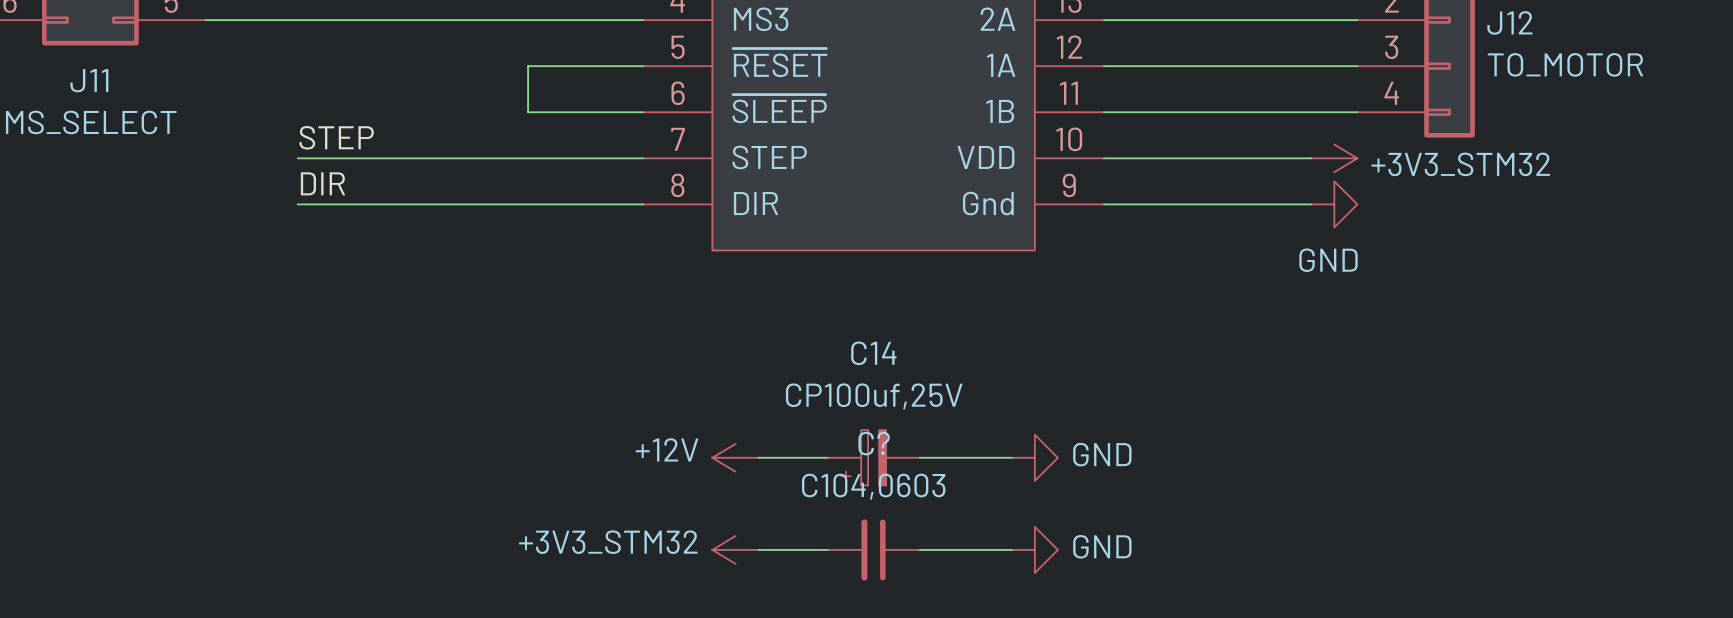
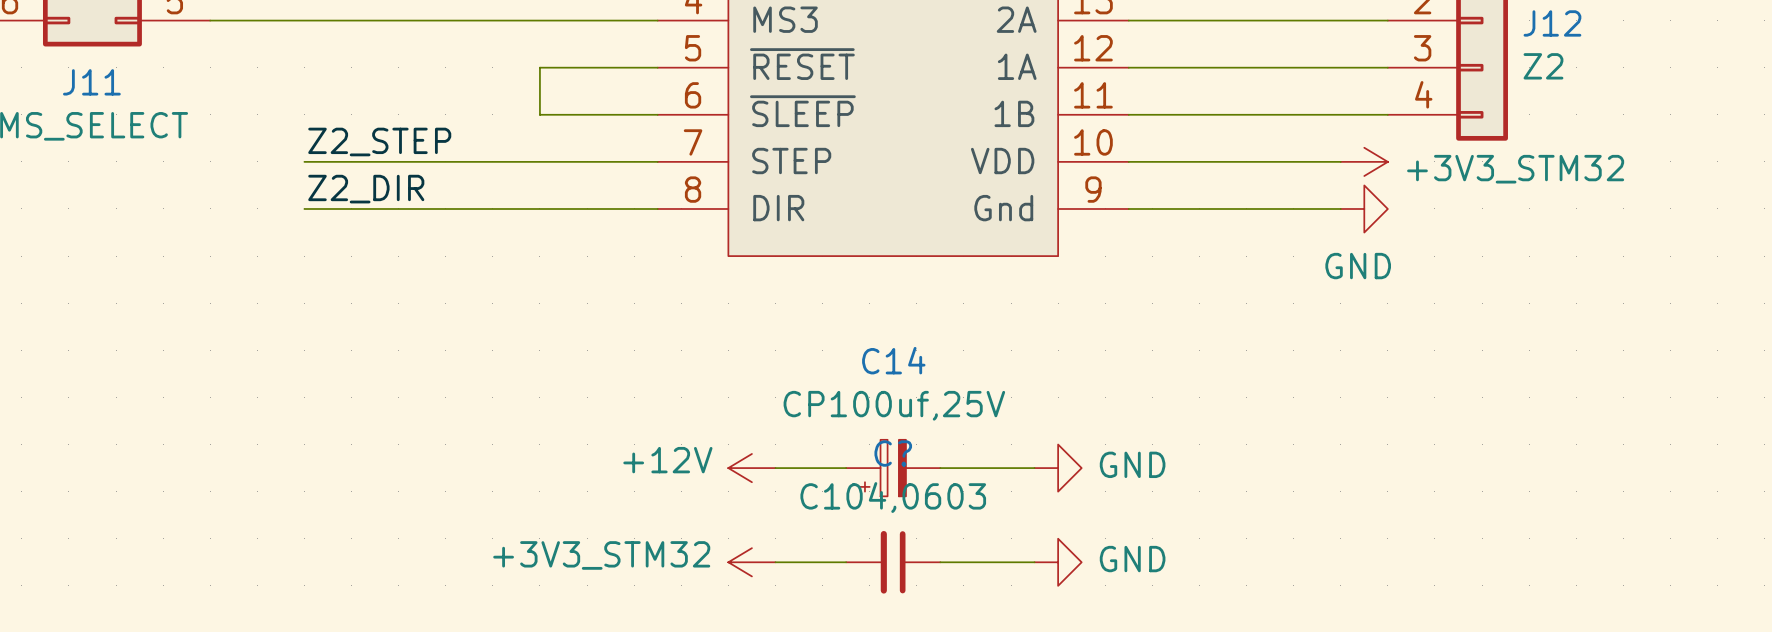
J12 value: TO_MOTOR (1565, 64) -> Z2 (1543, 66)
label: STEP (336, 137) -> Z2_STEP (379, 141)
label: DIR (322, 183) -> Z2_DIR (366, 189)

